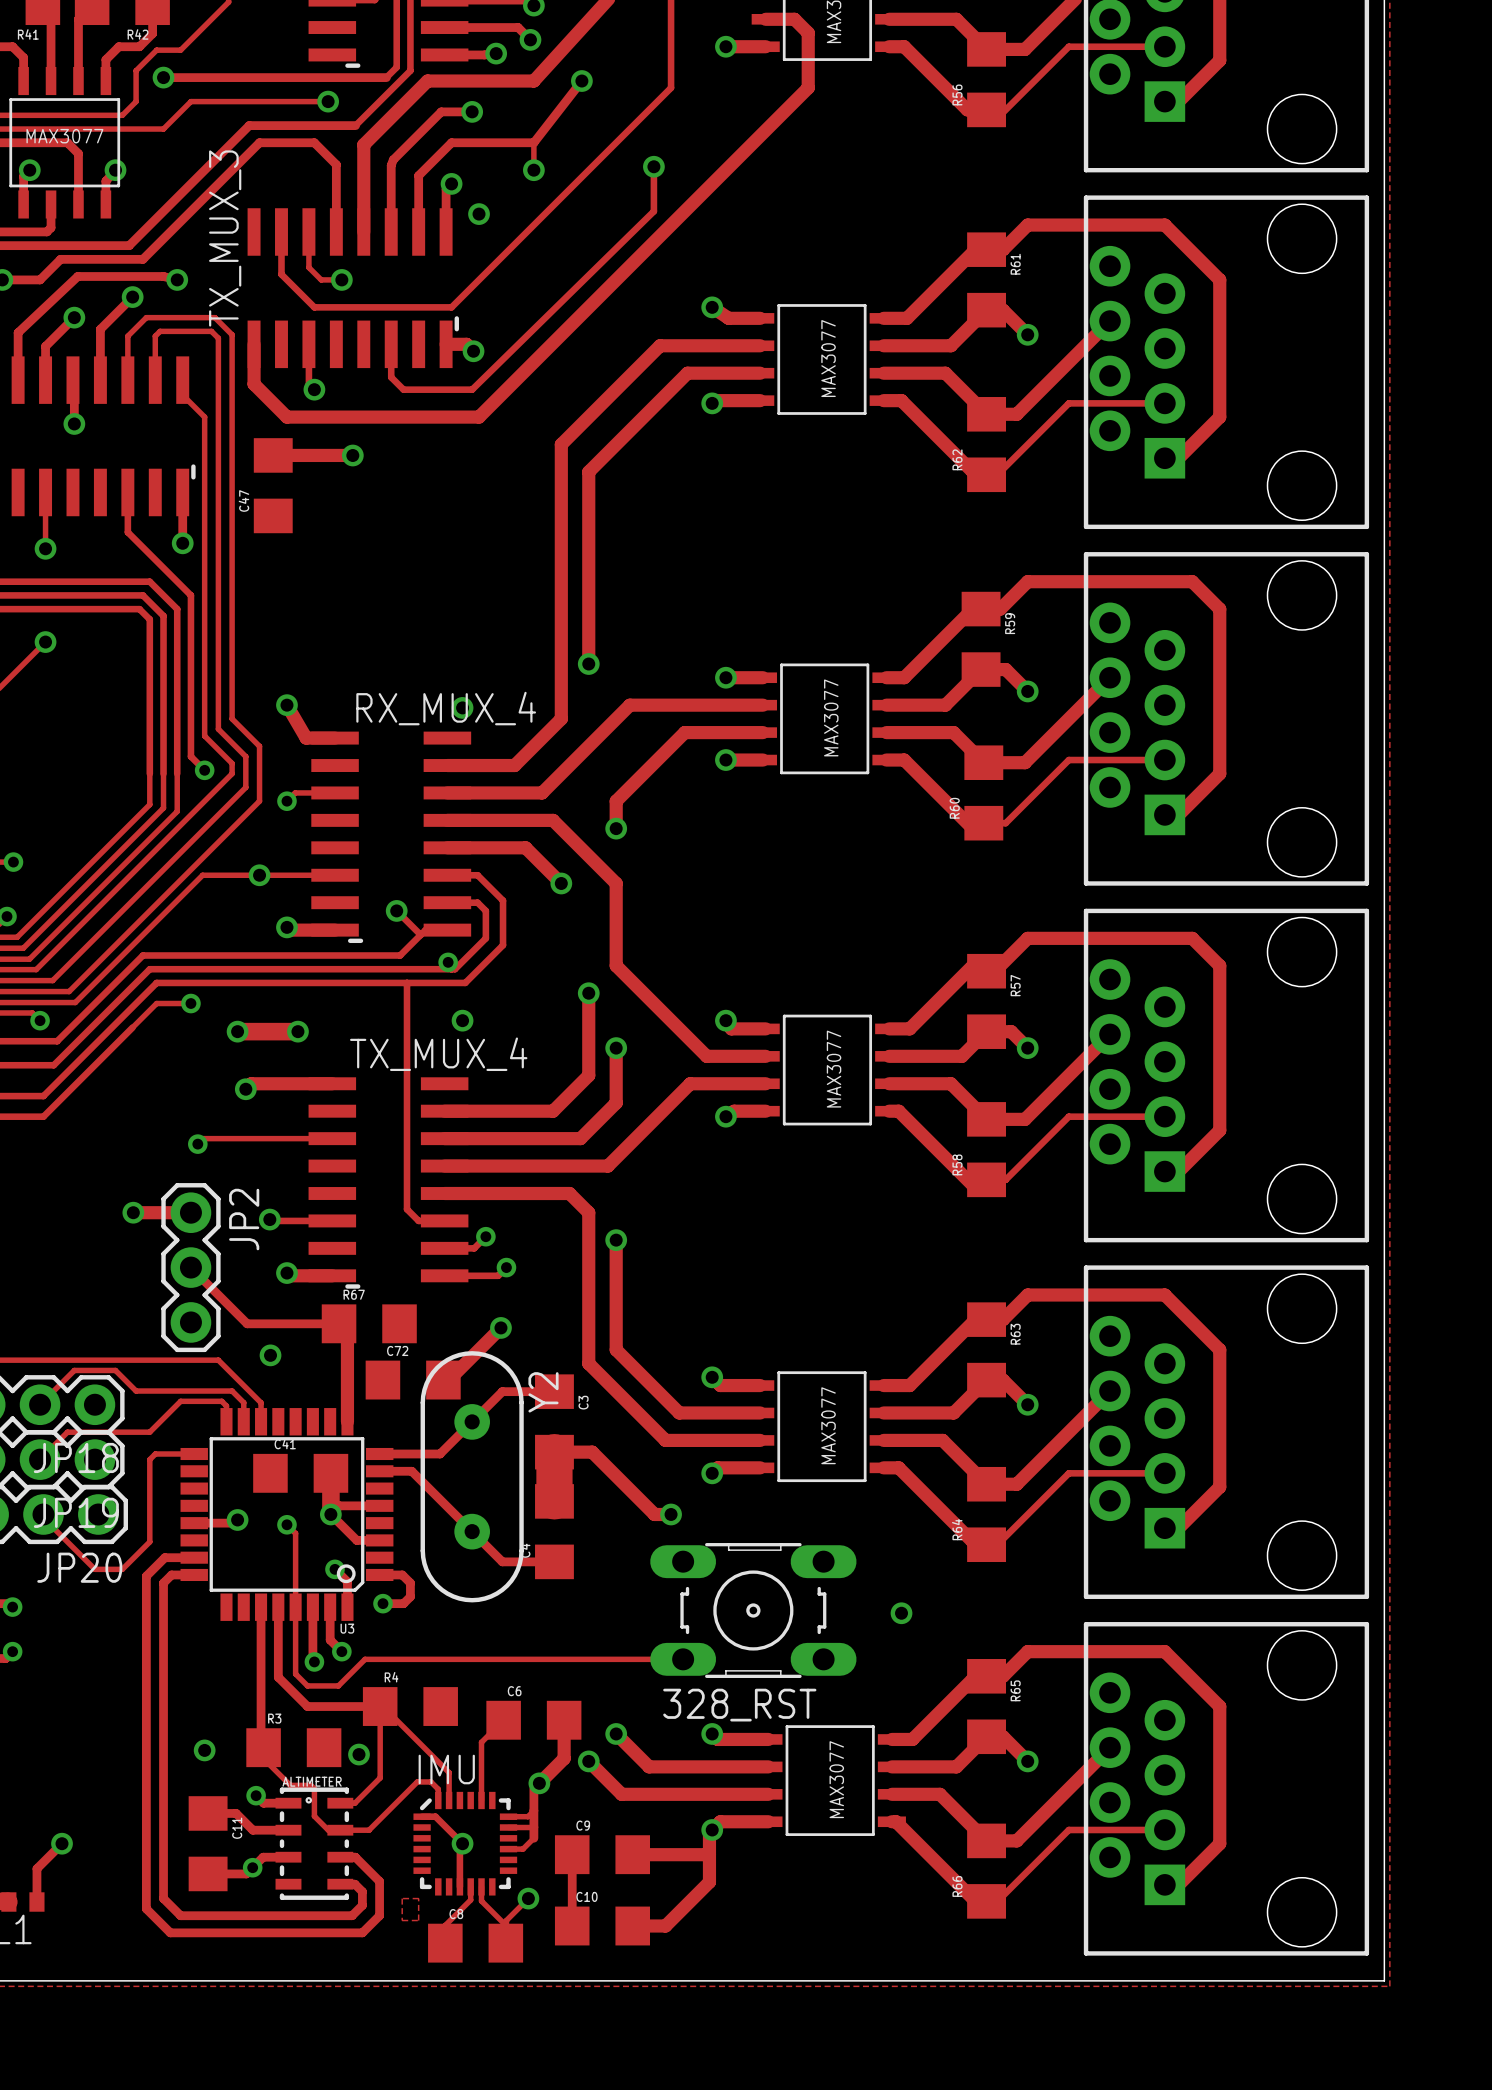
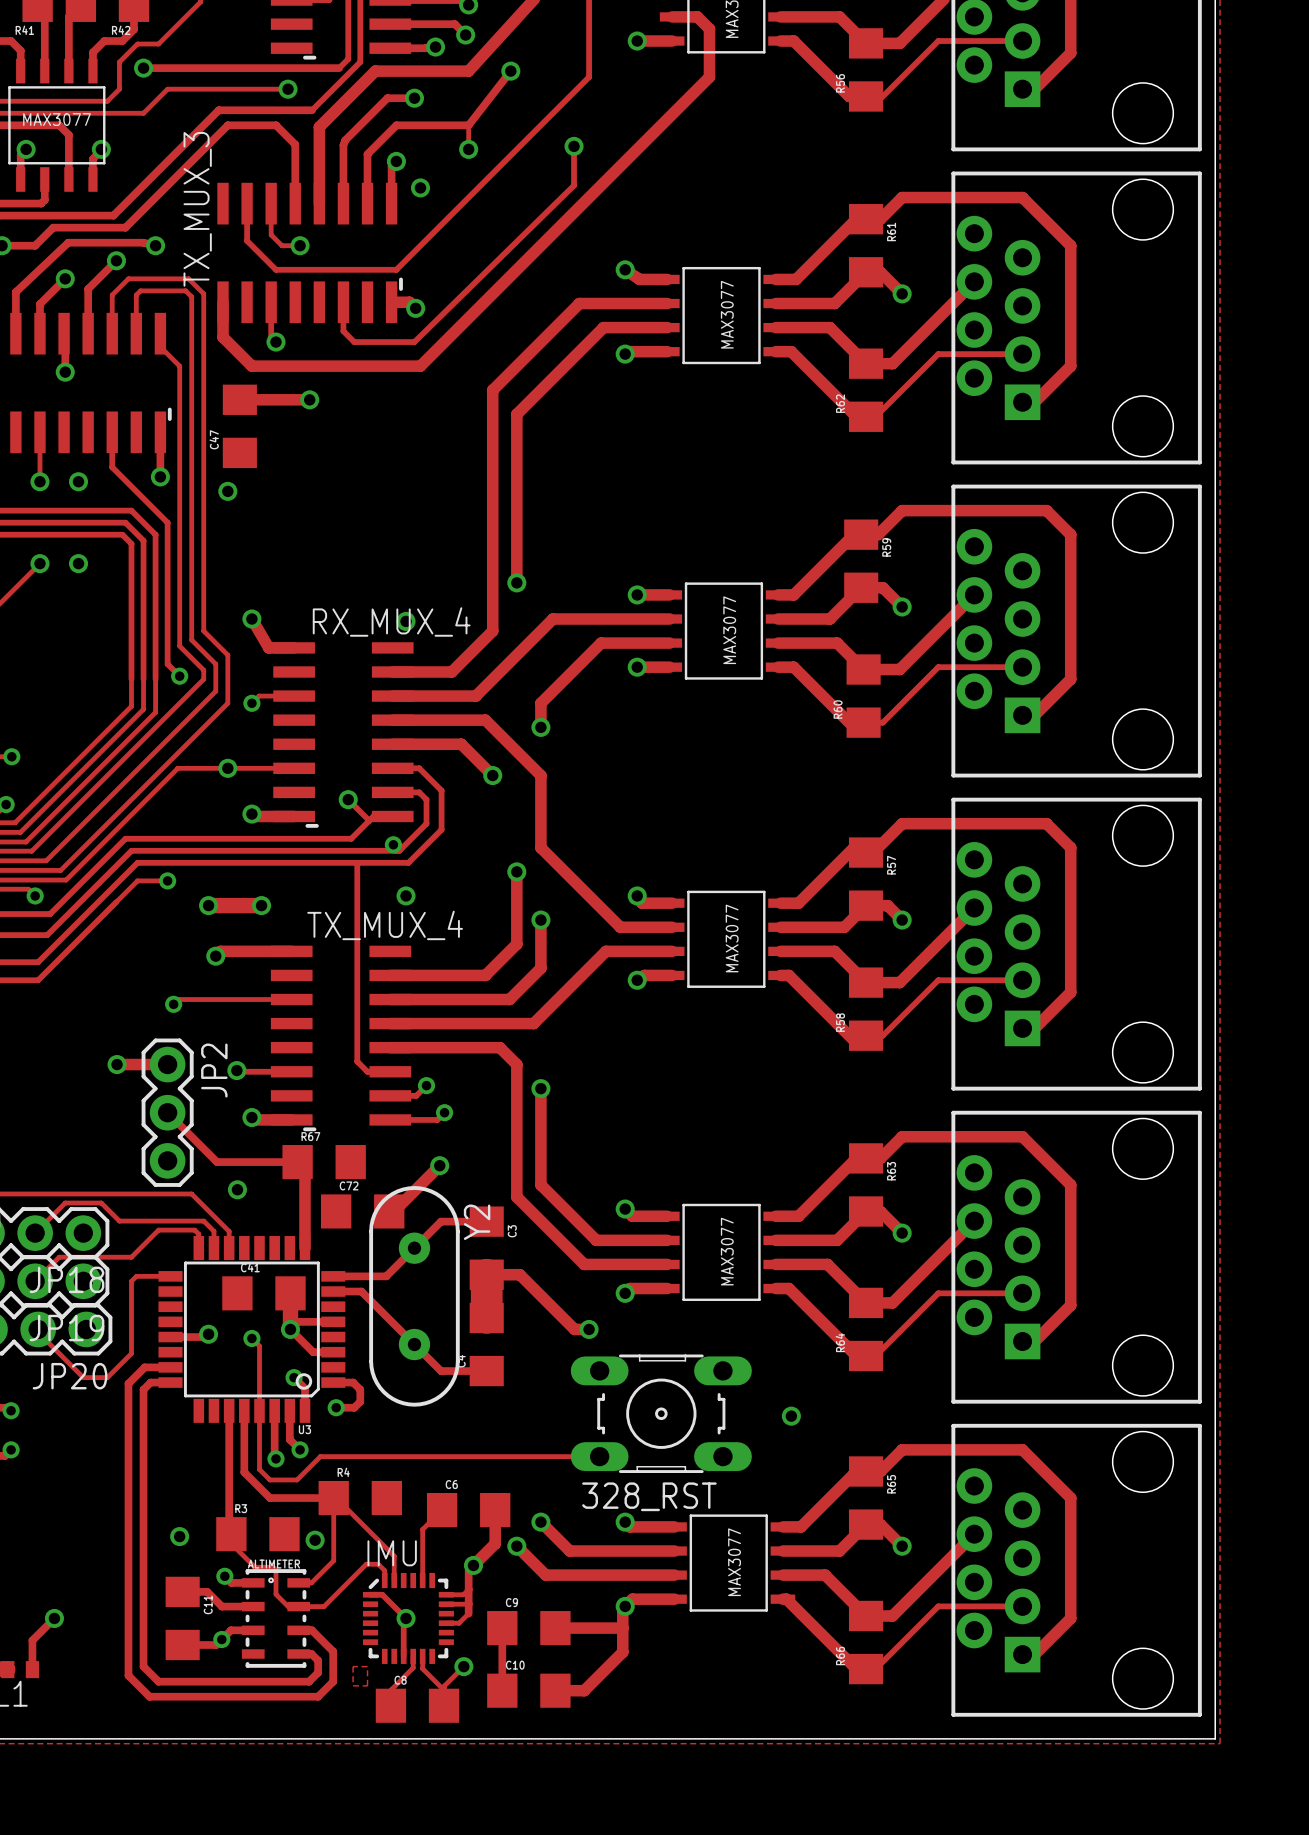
via: none -> (78, 481)
via: none -> (227, 491)
via: none -> (78, 563)

